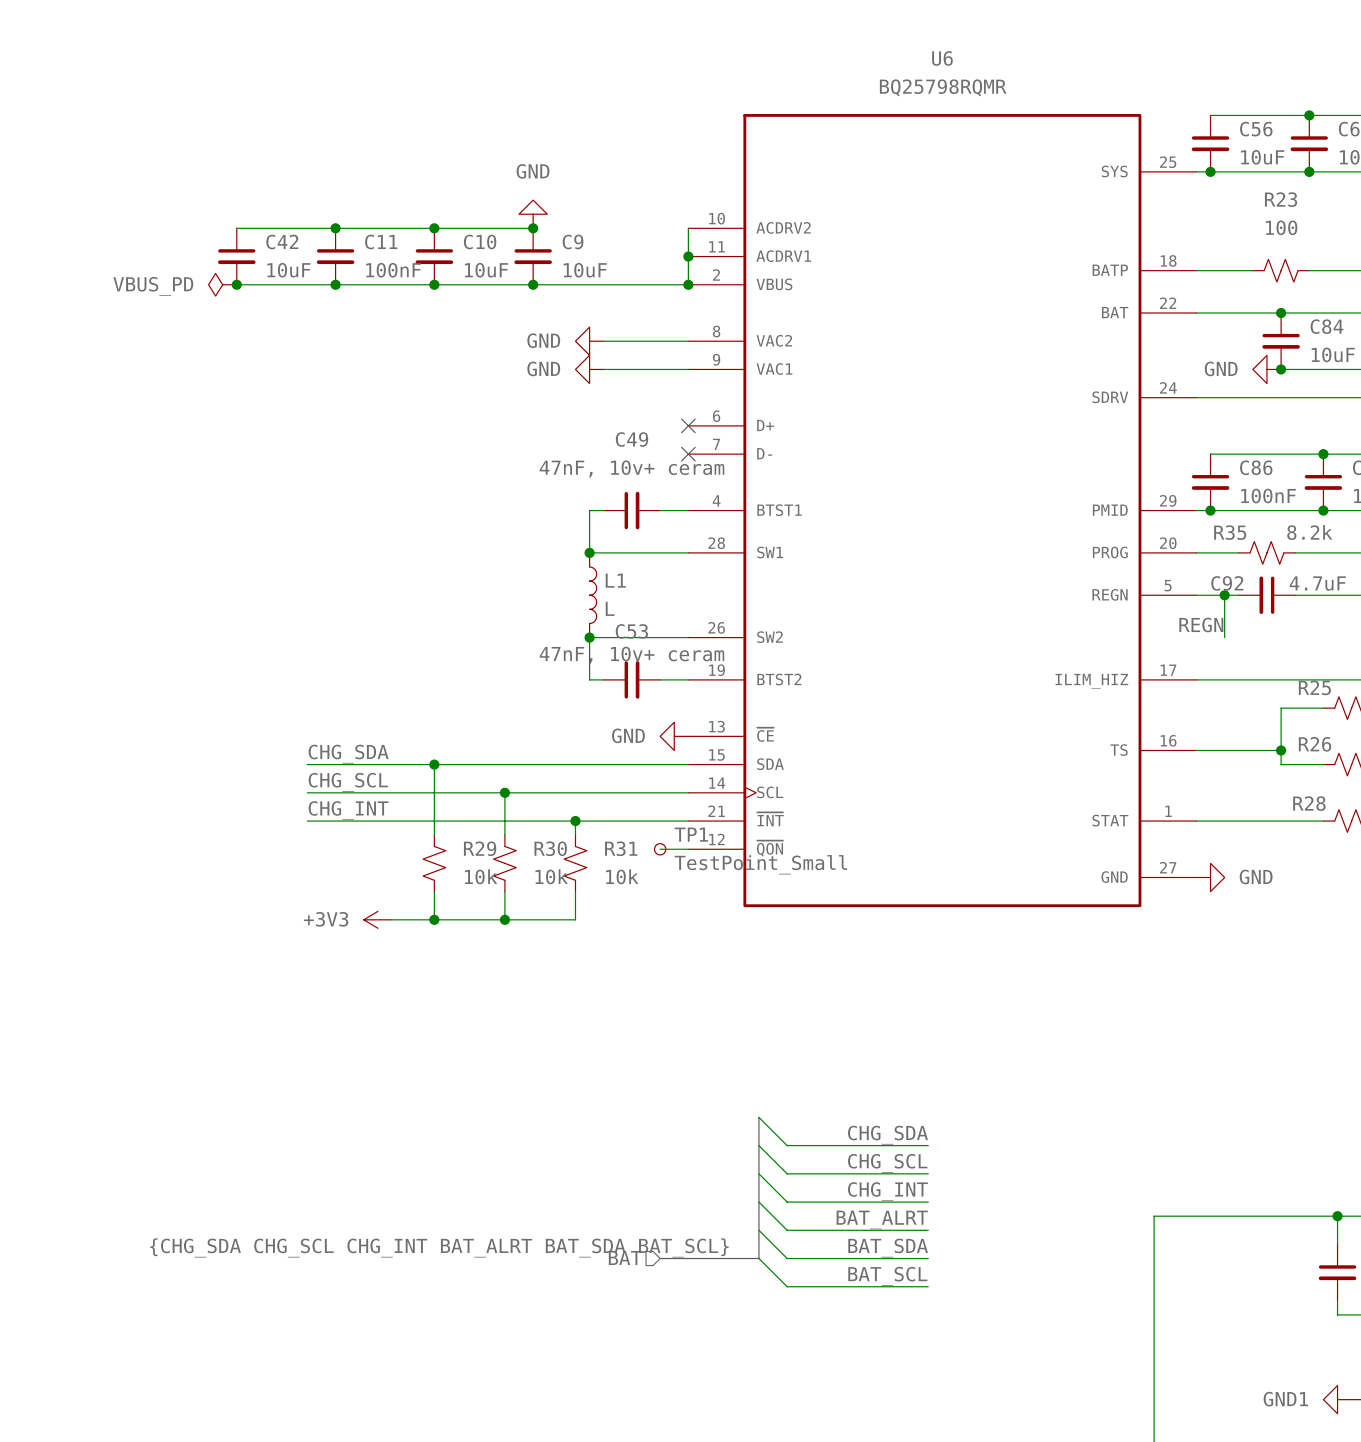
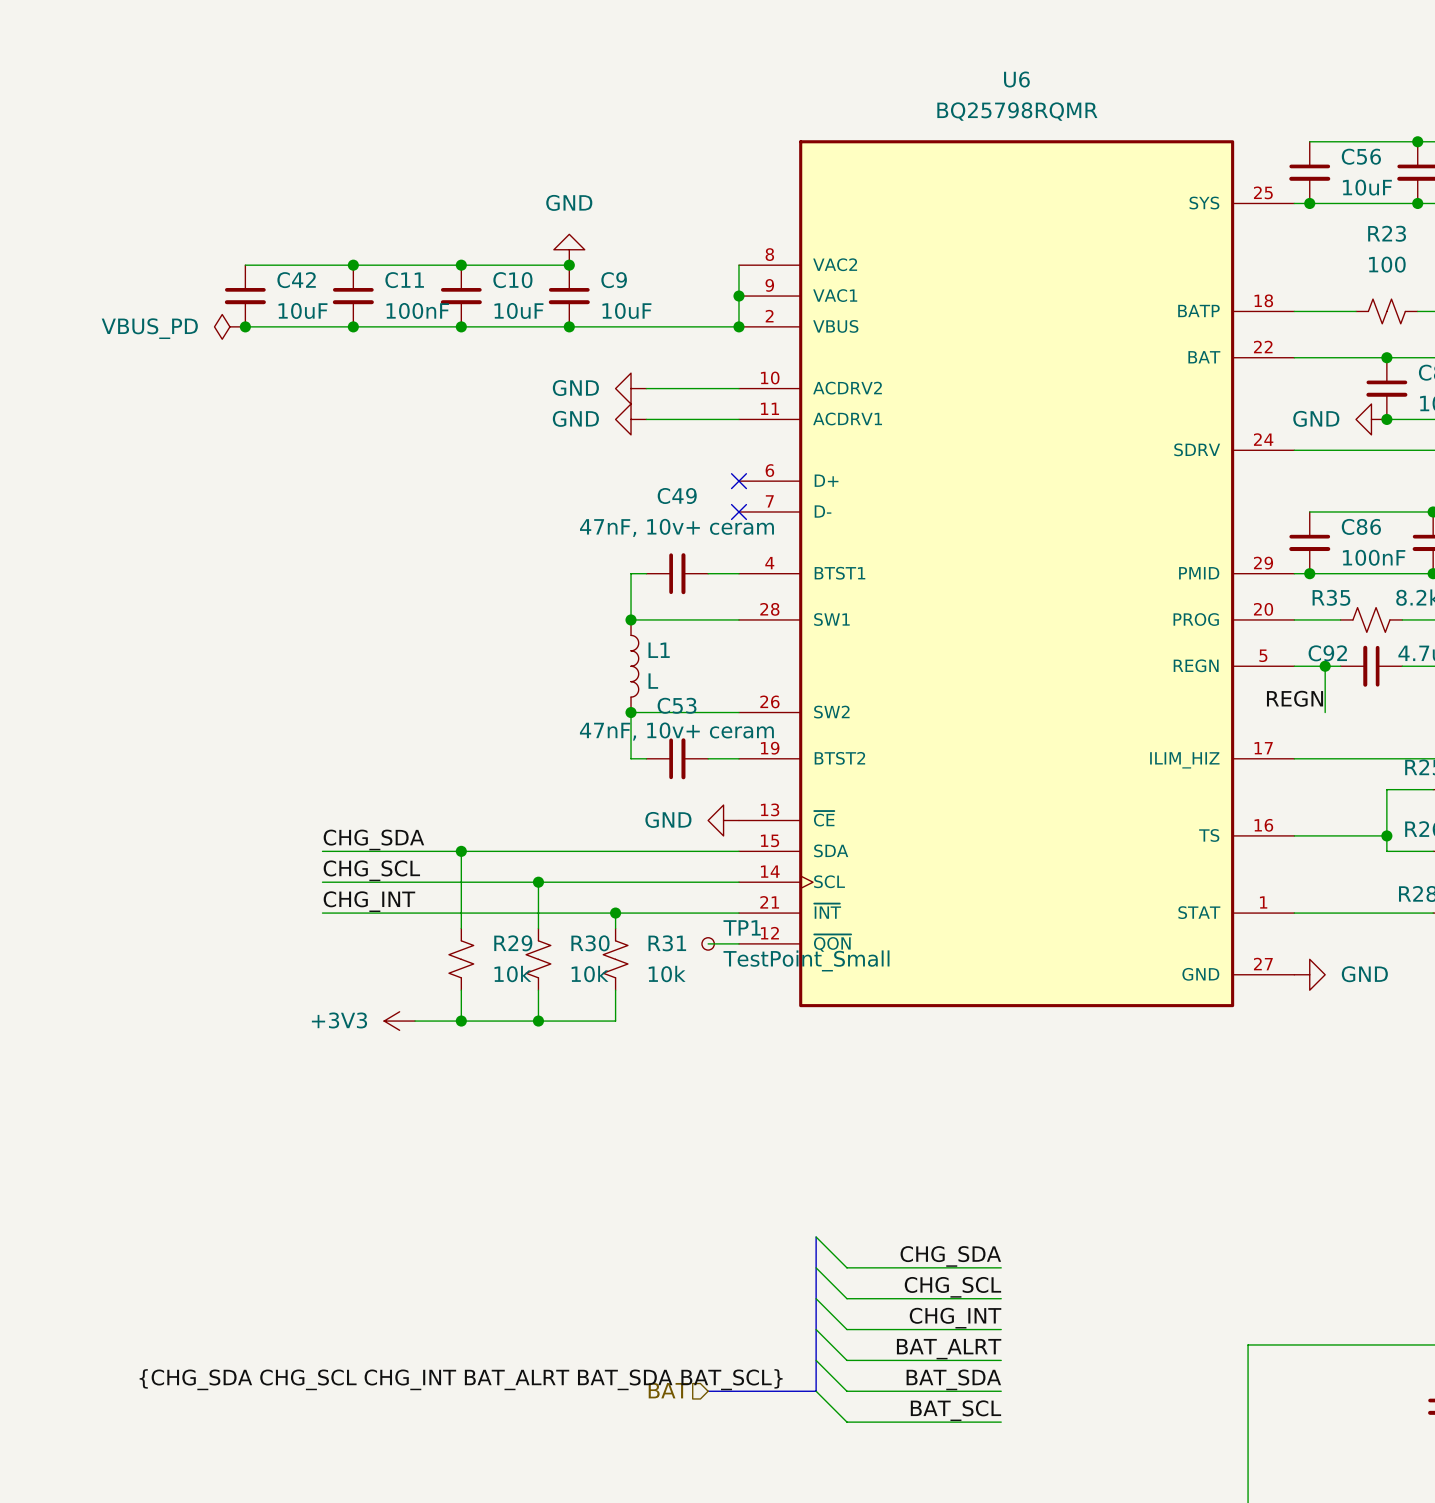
U6 pin number: 10 (717, 218) -> 8 (769, 254)
U6 pin name: ACDRV2 (783, 227) -> VAC2 (835, 264)
U6 pin number: 11 (717, 246) -> 9 (769, 285)
U6 pin name: ACDRV1 (783, 256) -> VAC1 (835, 295)
U6 pin number: 8 (716, 331) -> 10 (770, 377)
U6 pin name: VAC2 (774, 340) -> ACDRV2 (847, 388)
U6 pin number: 9 (716, 359) -> 11 (769, 408)
U6 pin name: VAC1 (774, 369) -> ACDRV1 (847, 418)

